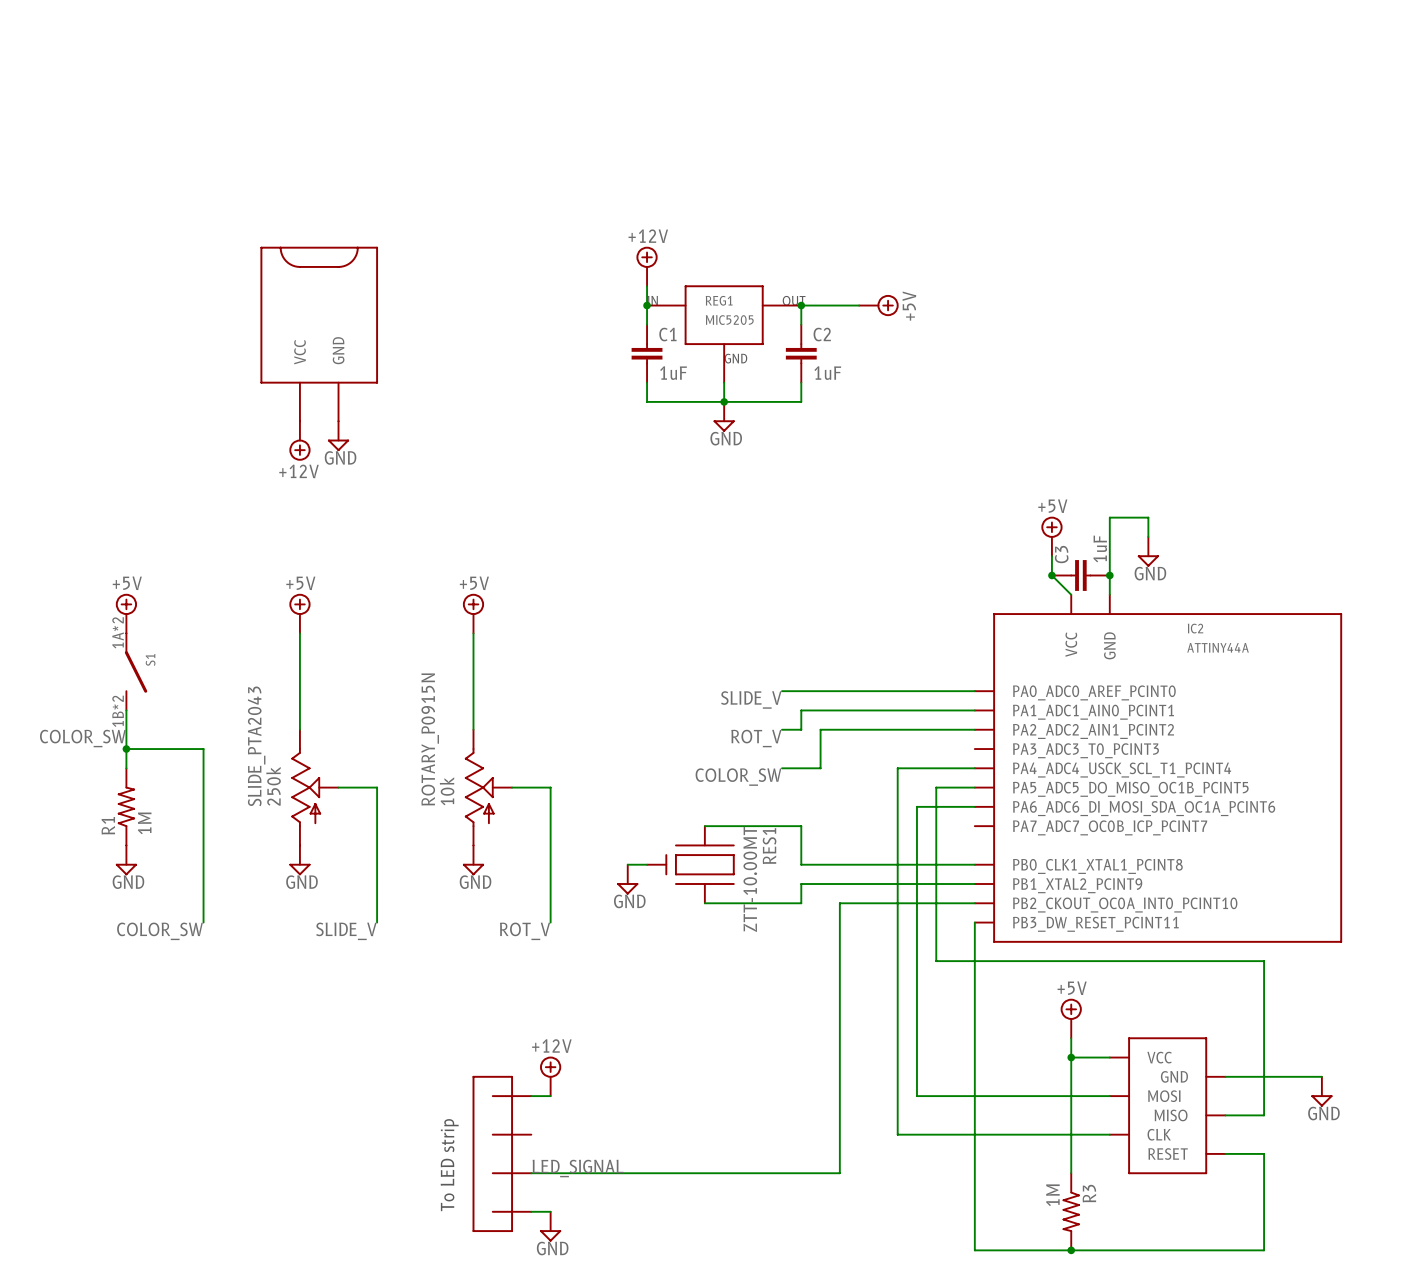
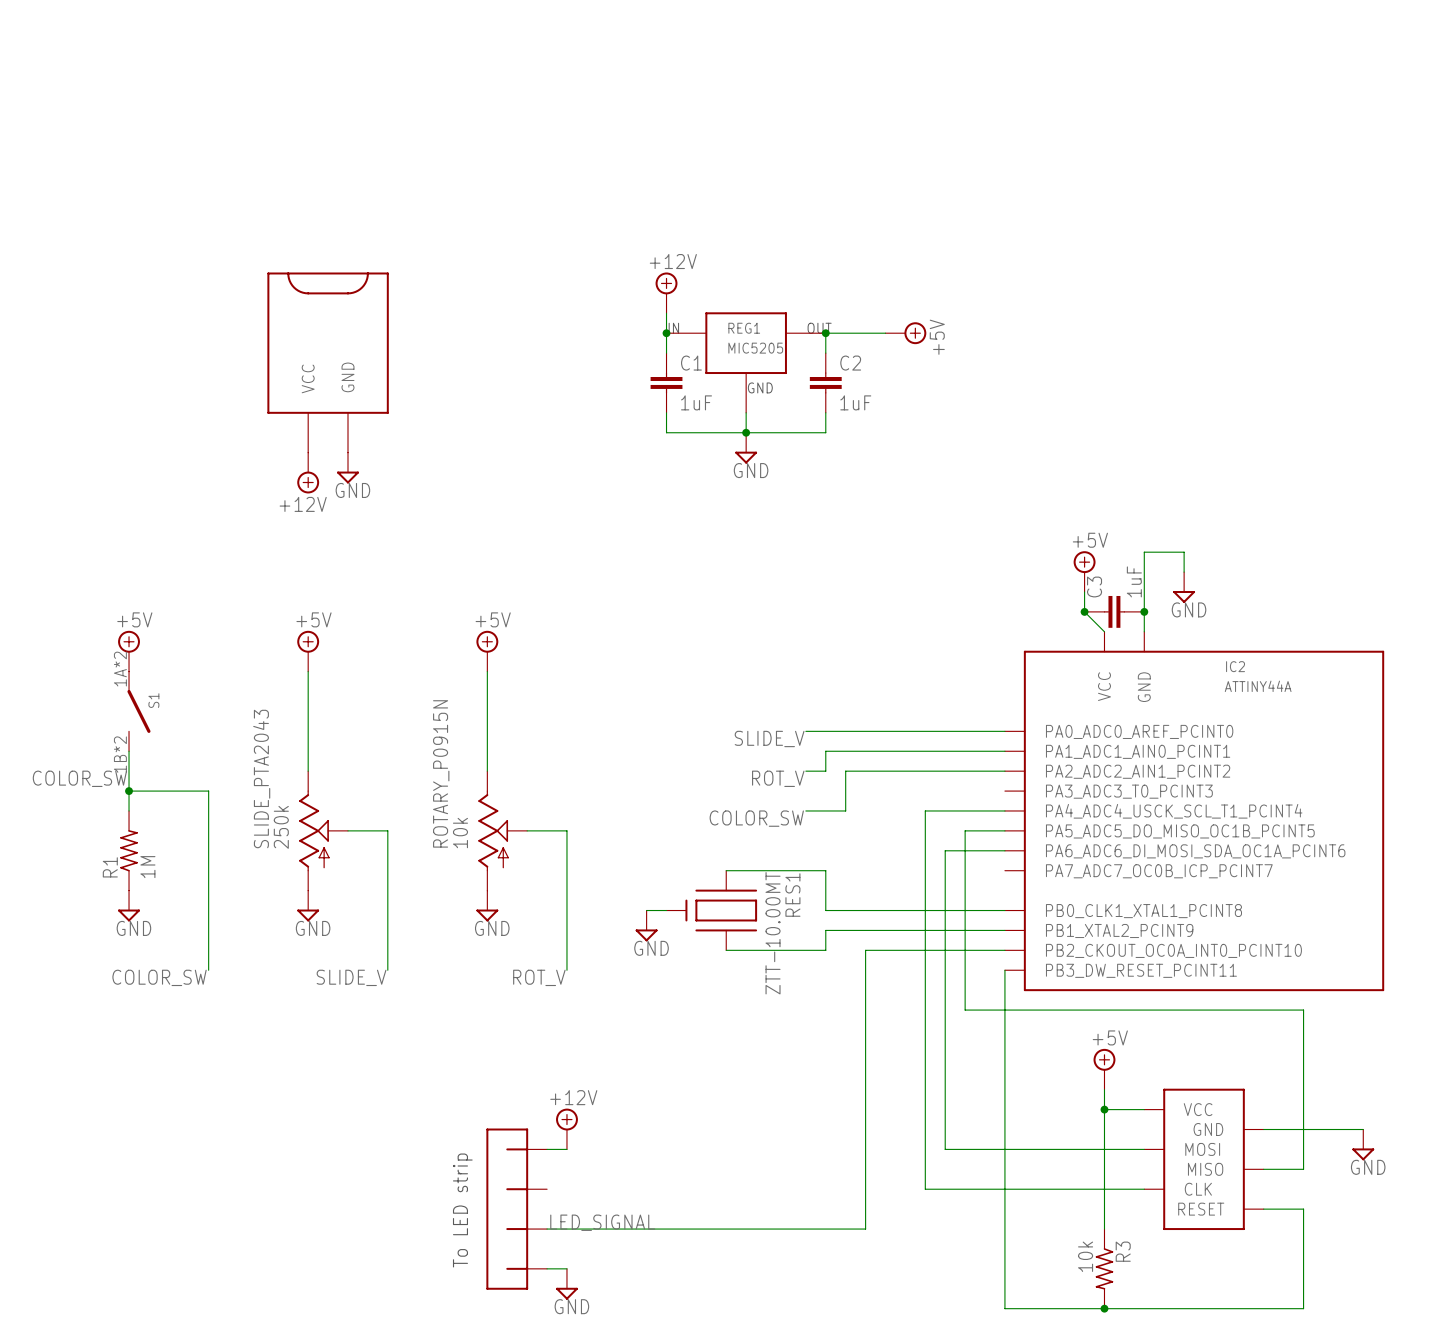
R3 value: 1M (1052, 1195) -> 10k (1085, 1256)

